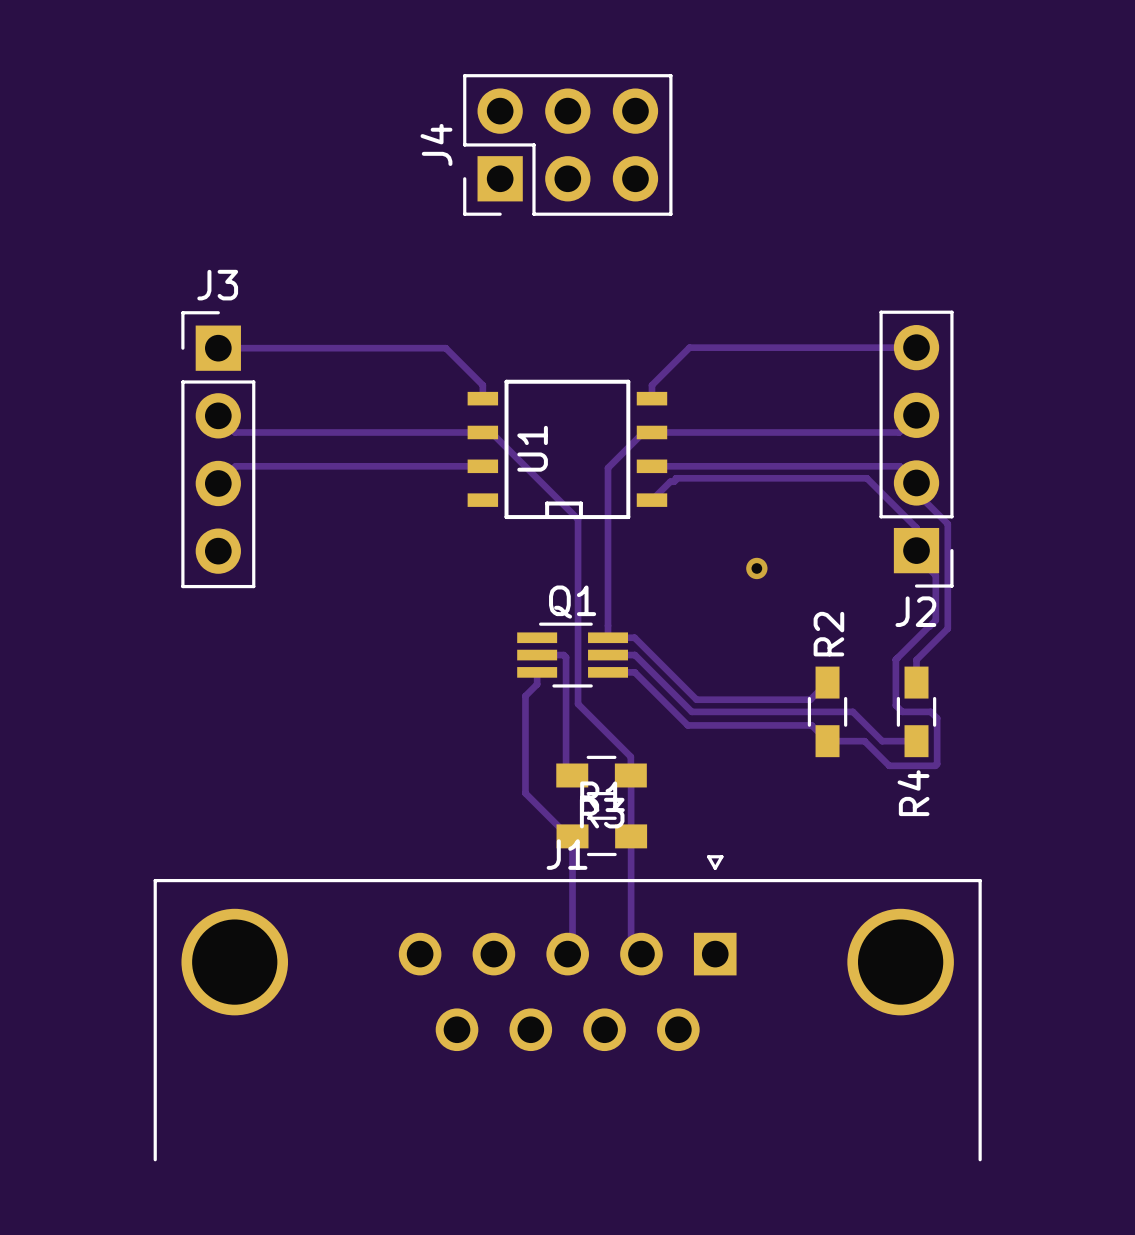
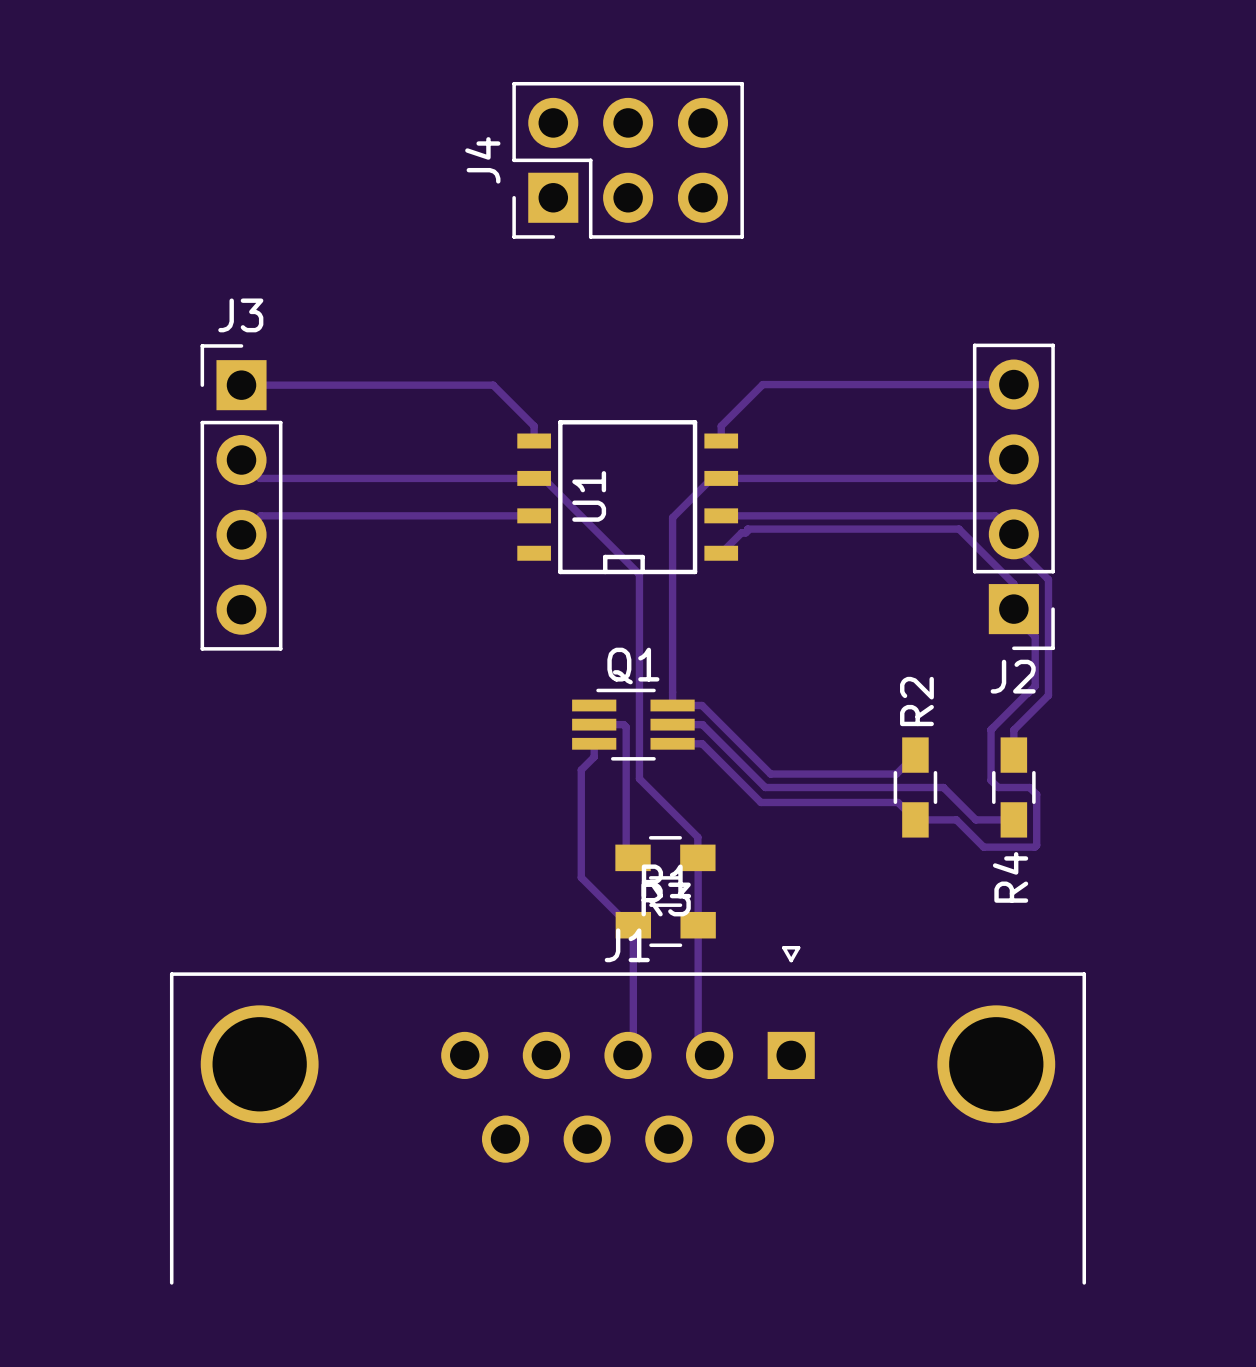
via: (756, 568) -> none

